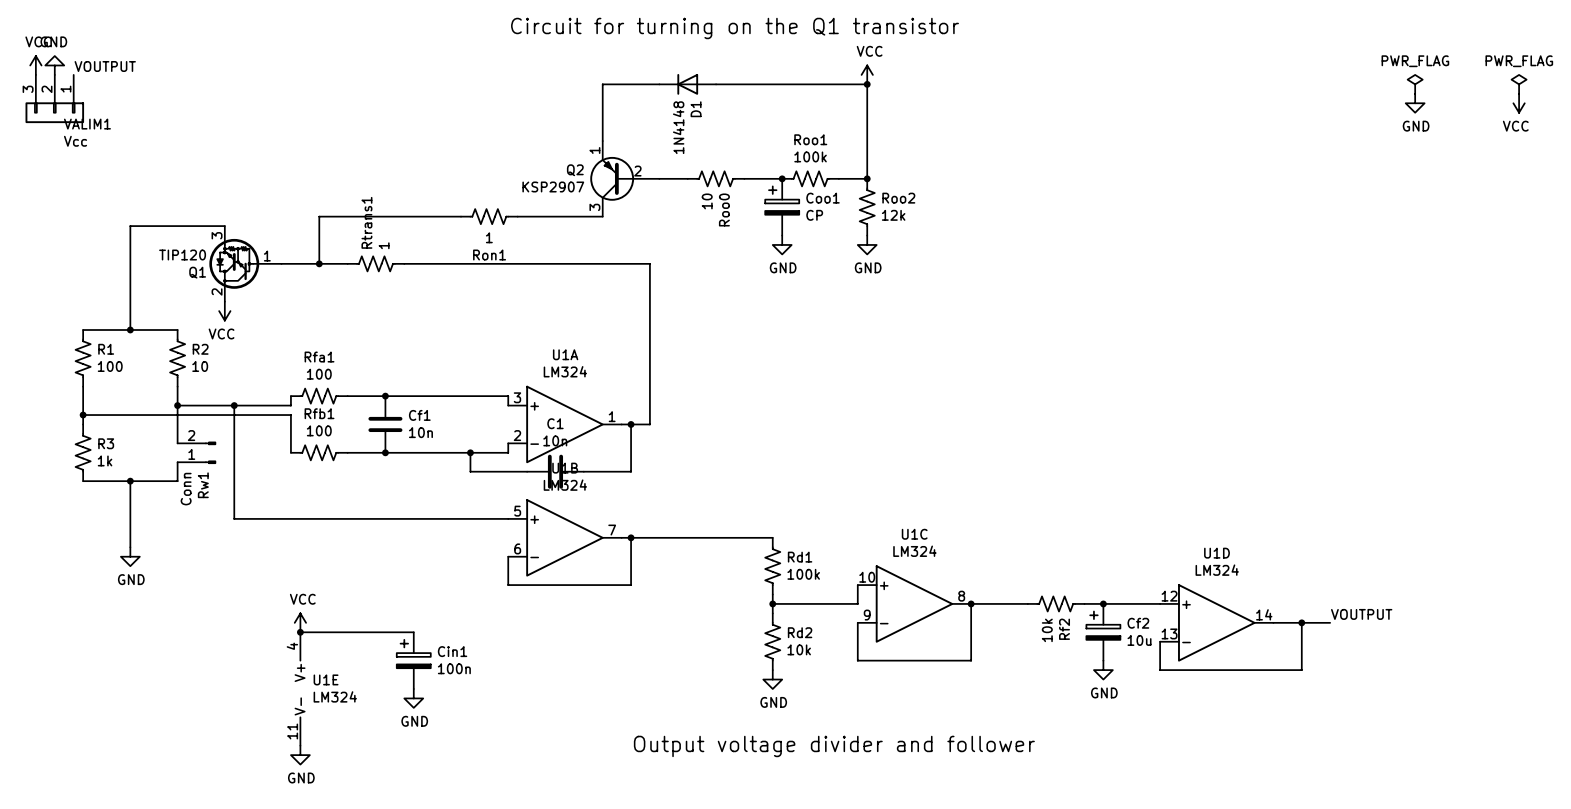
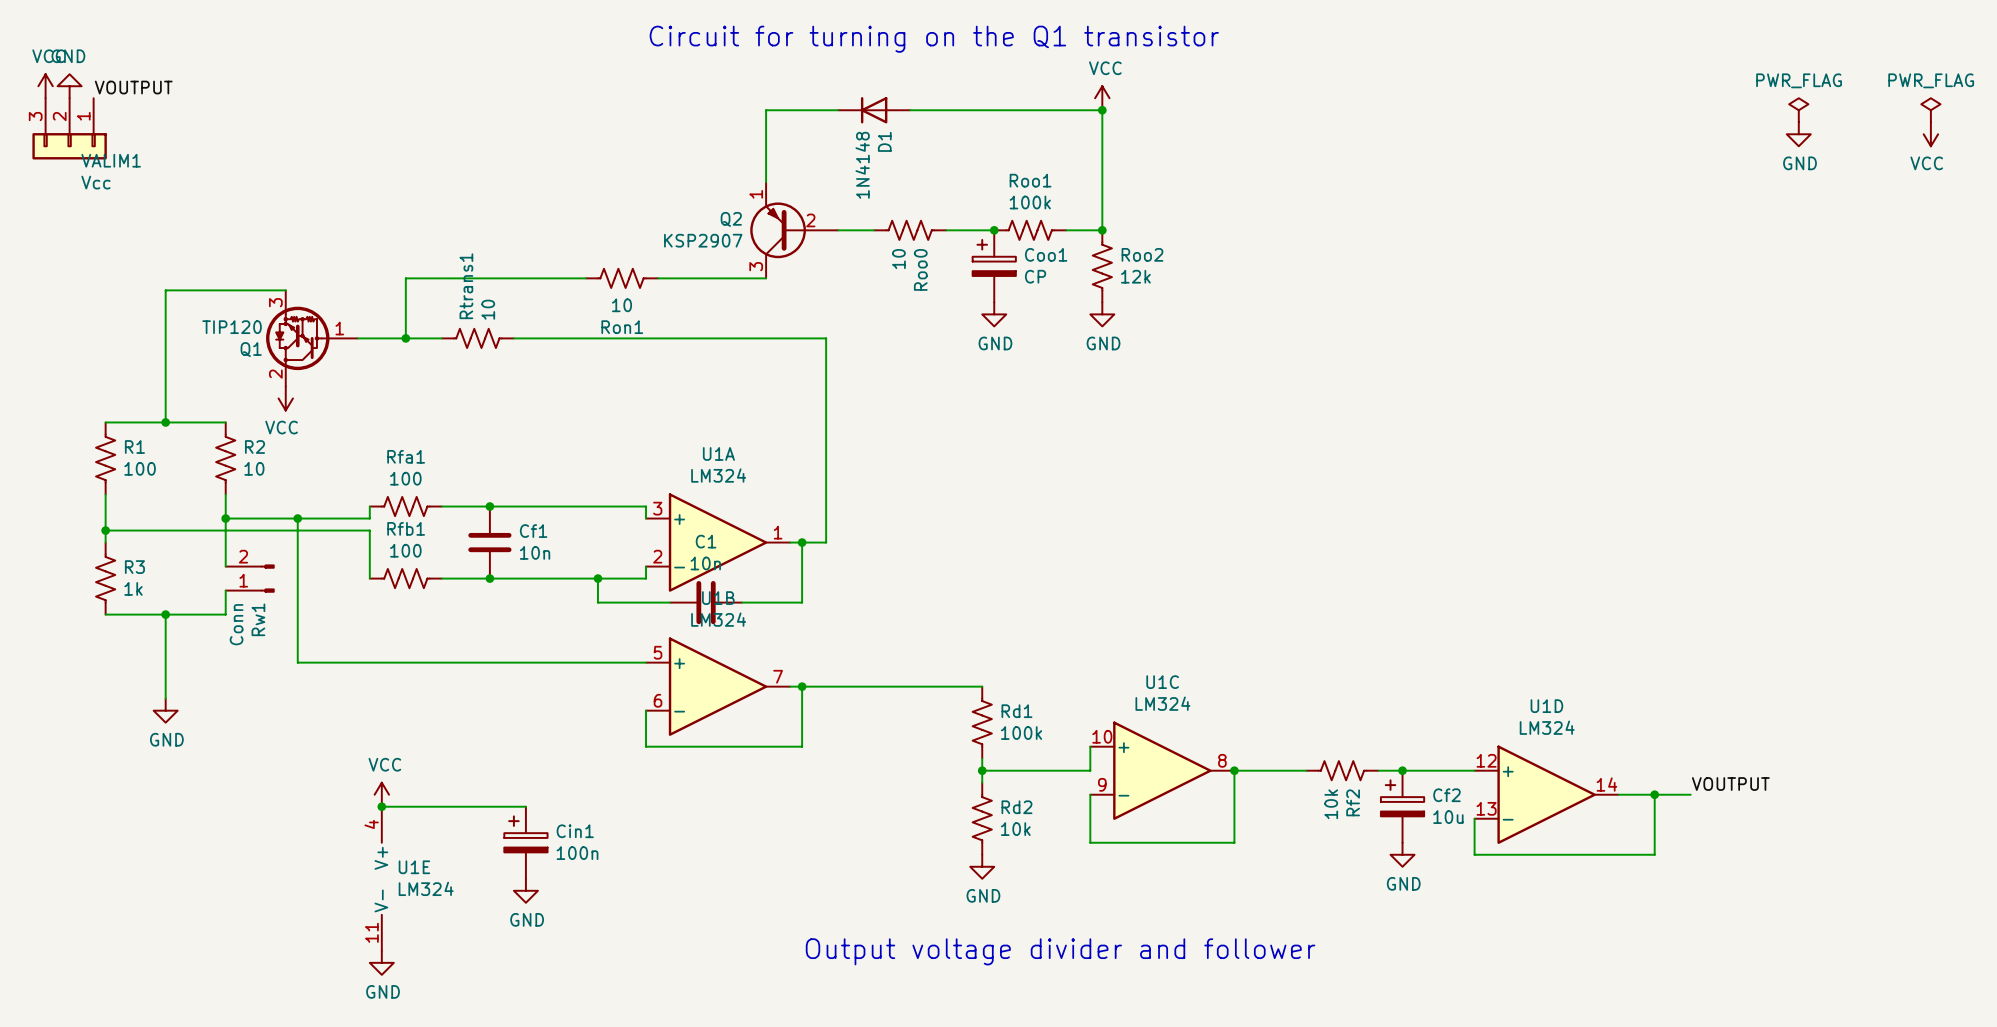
Ron1 value: 1 (489, 237) -> 10 (621, 305)
Rtrans1 value: 1 (384, 245) -> 10 (488, 309)

